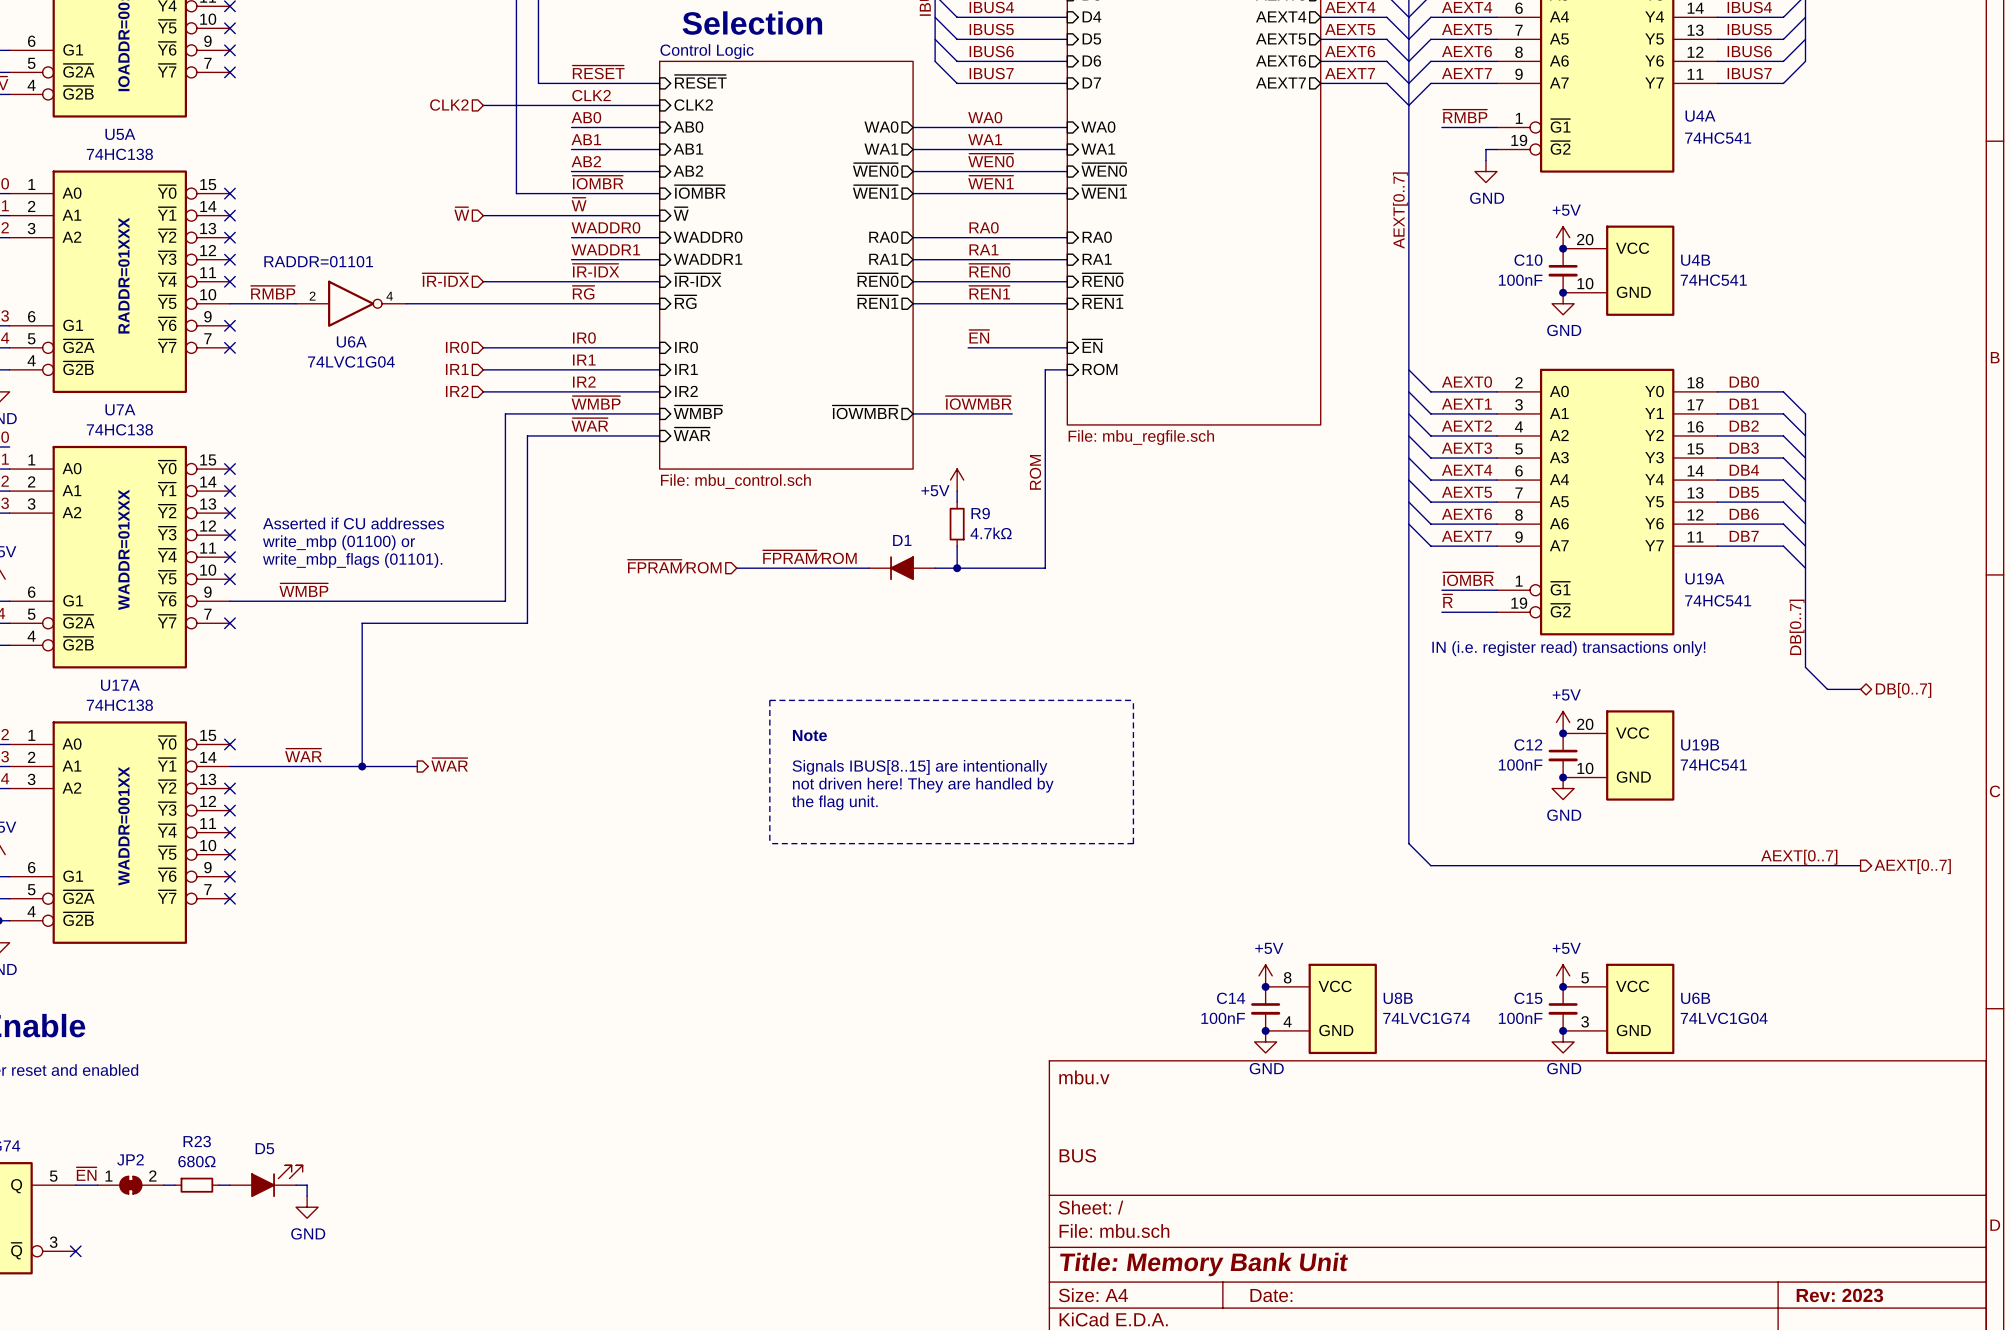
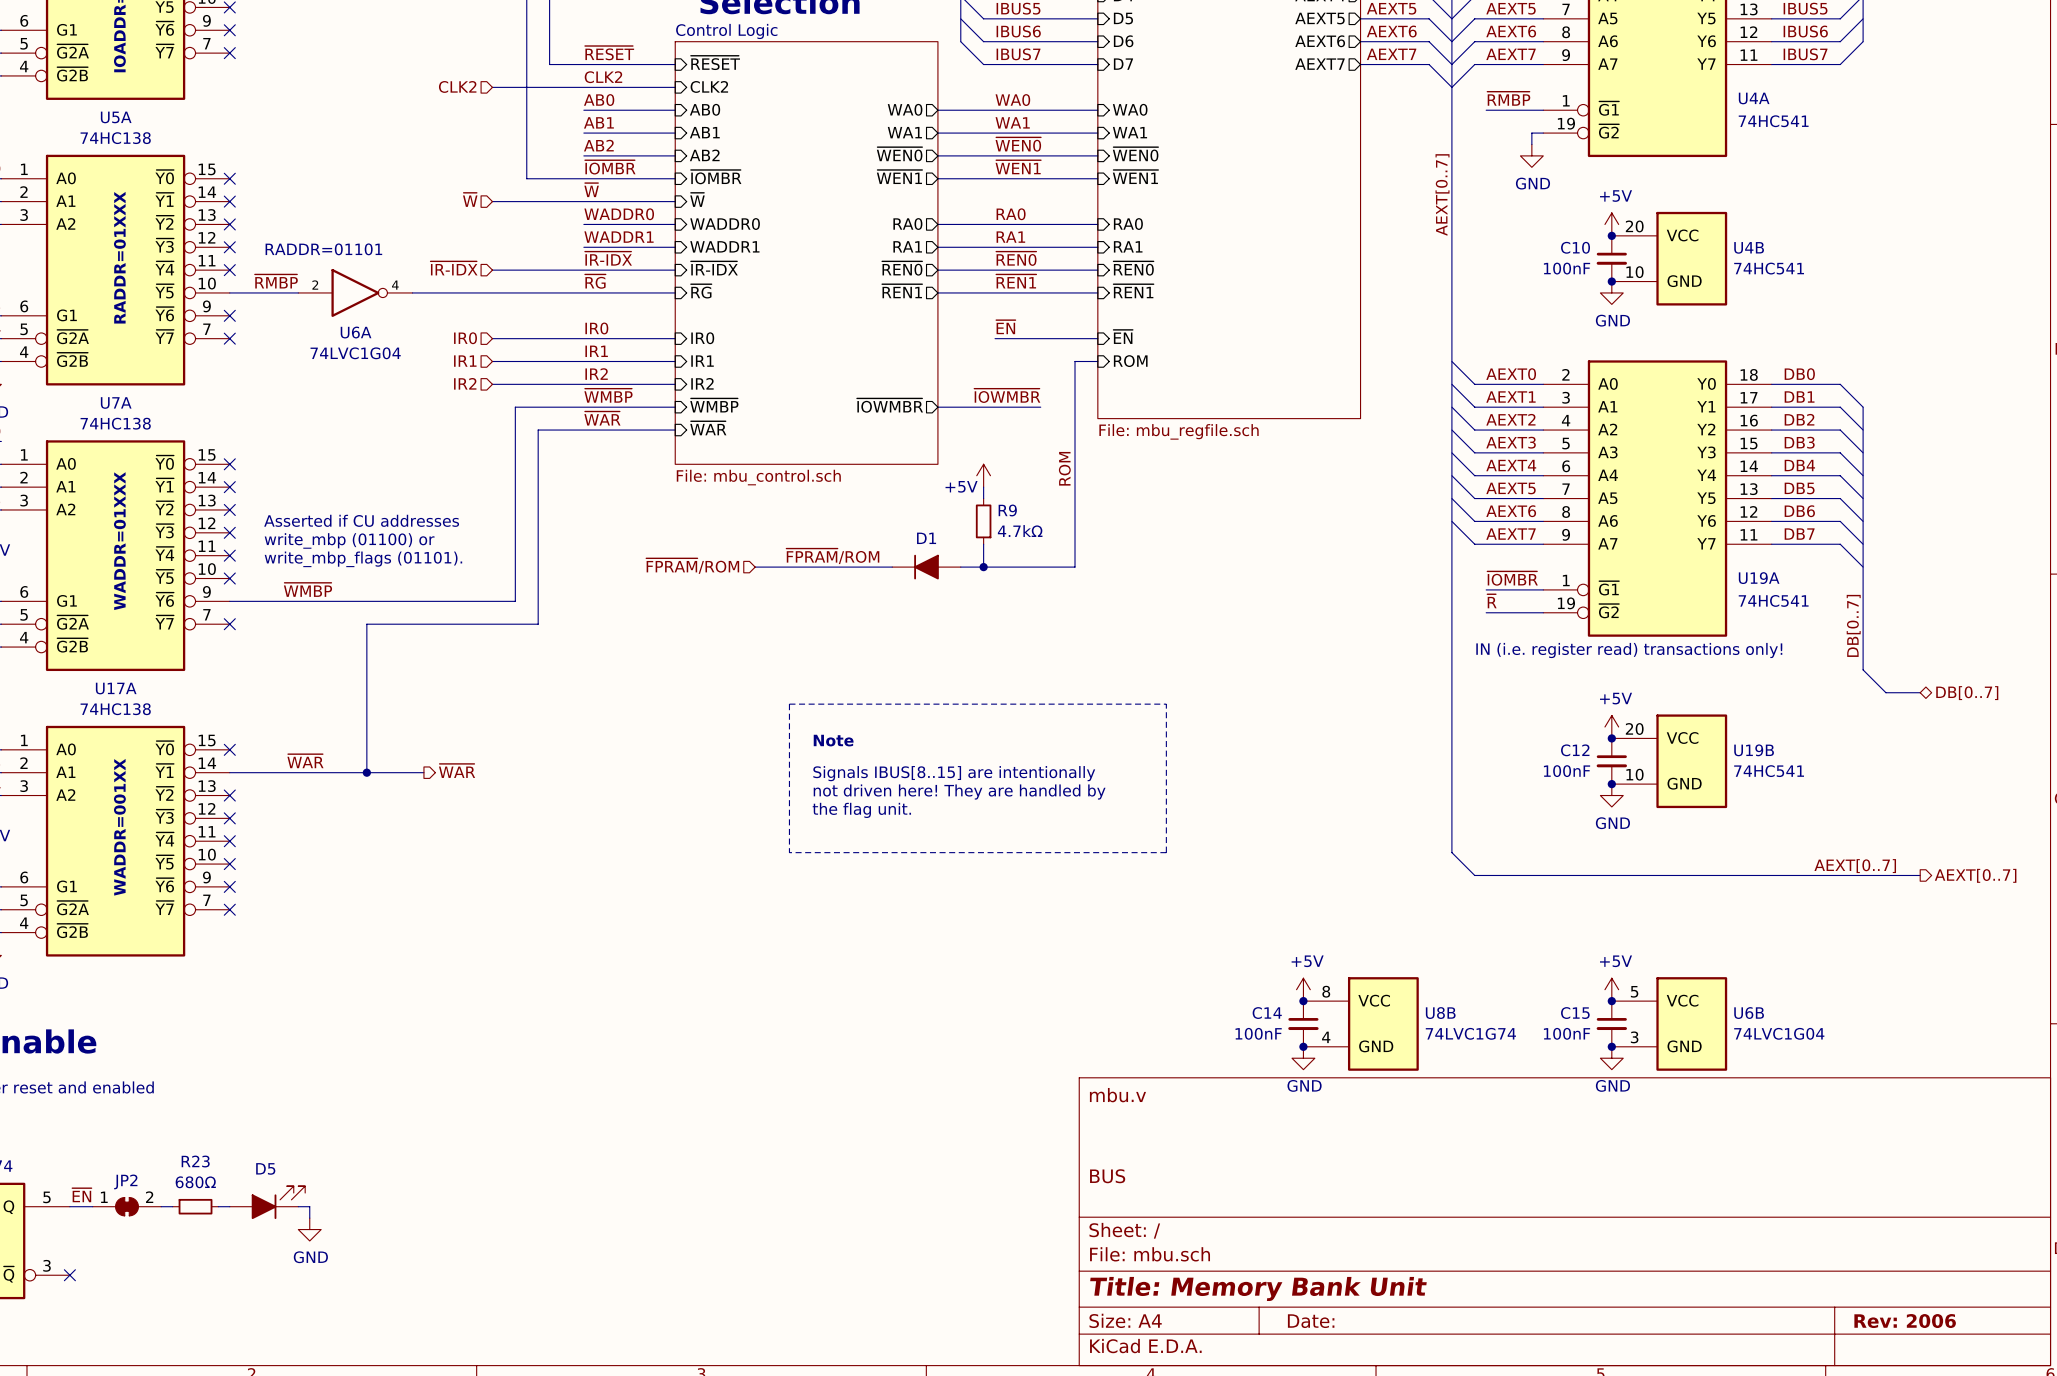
title block: Rev: 2023 (1839, 1295) -> Rev: 2006 (1905, 1321)

